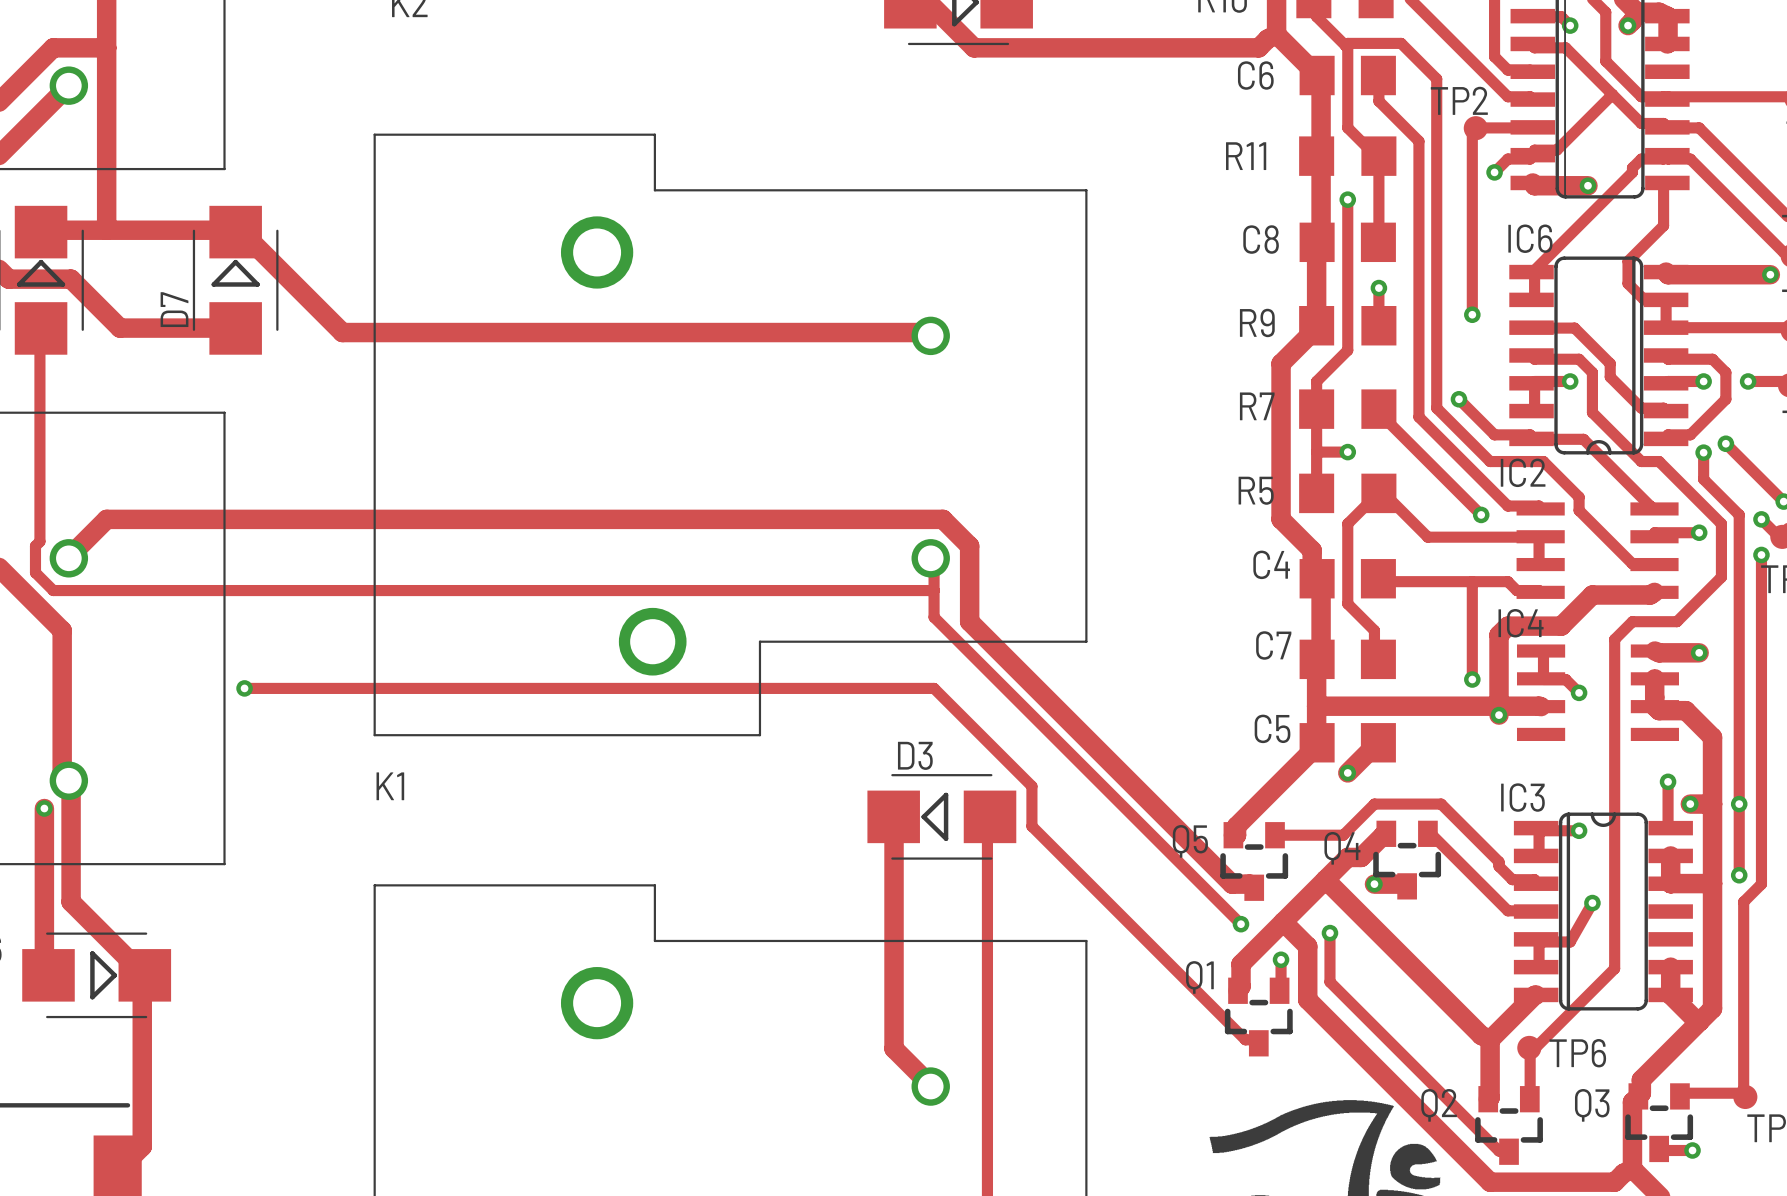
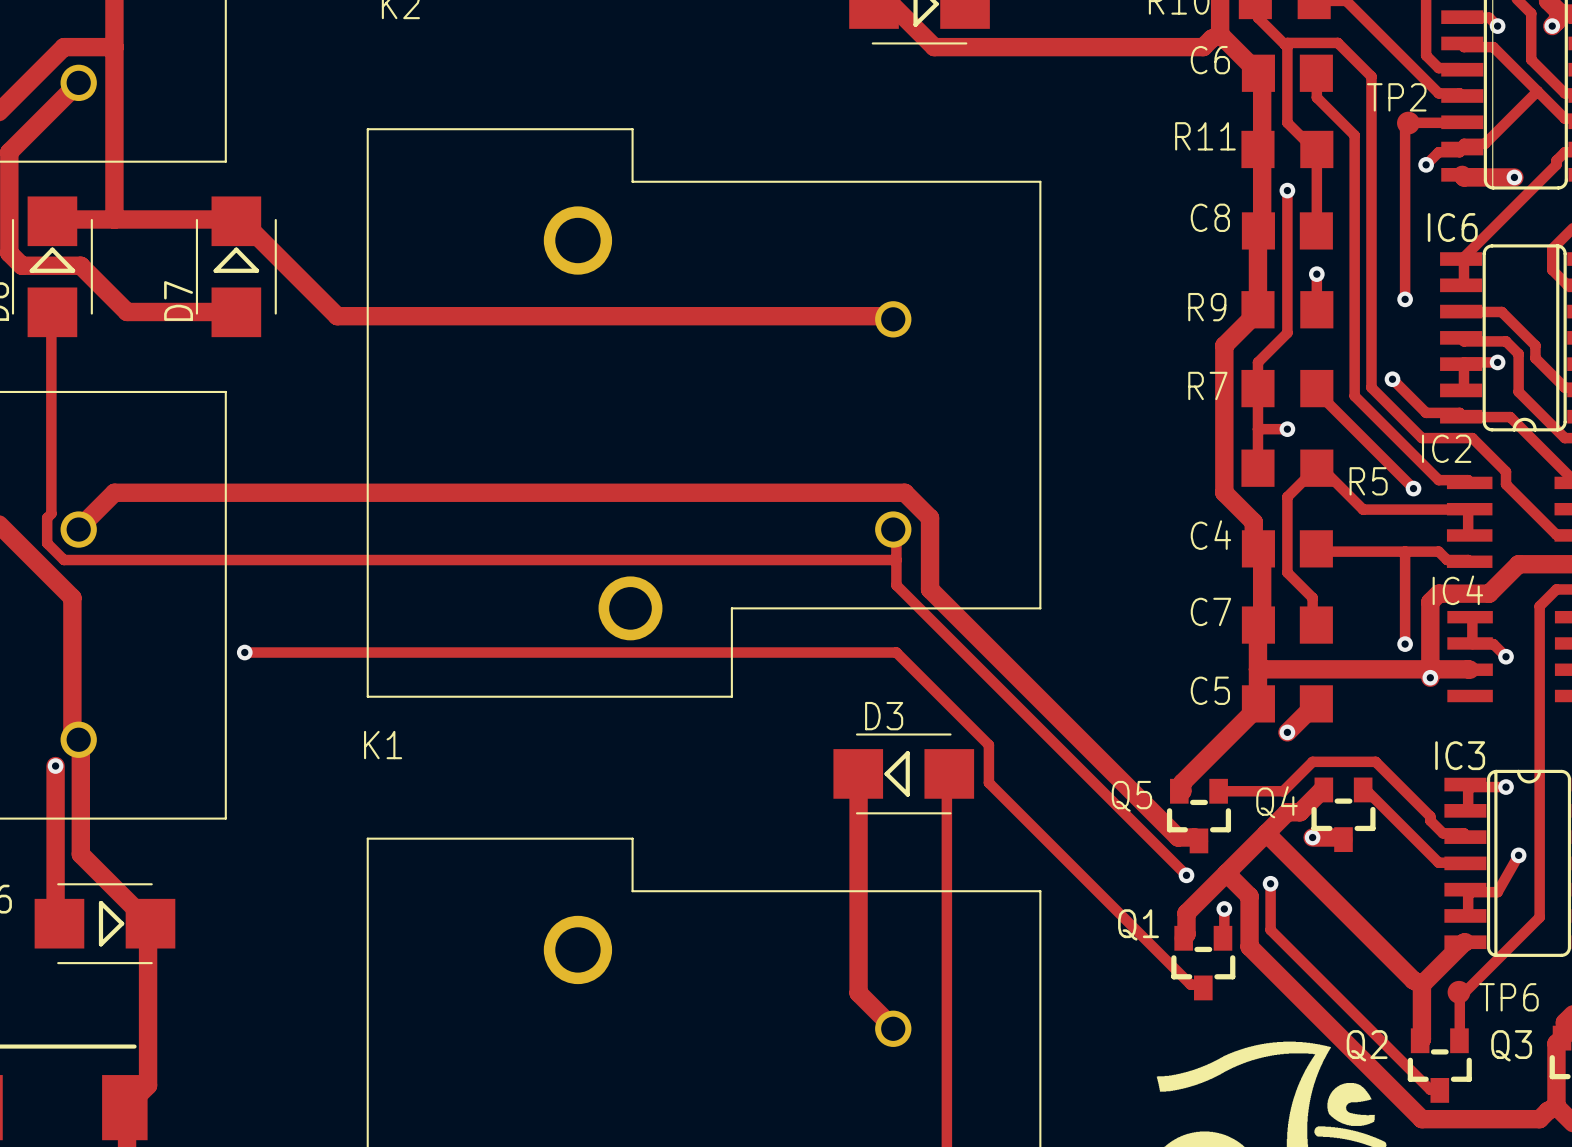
C6 name position: C6 (1255, 75) -> C6 (1210, 60)
R11 name position: R11 (1246, 156) -> R11 (1205, 136)
C8 name position: C8 (1261, 239) -> C8 (1210, 217)
R5 name position: R5 (1256, 490) -> R5 (1368, 481)

